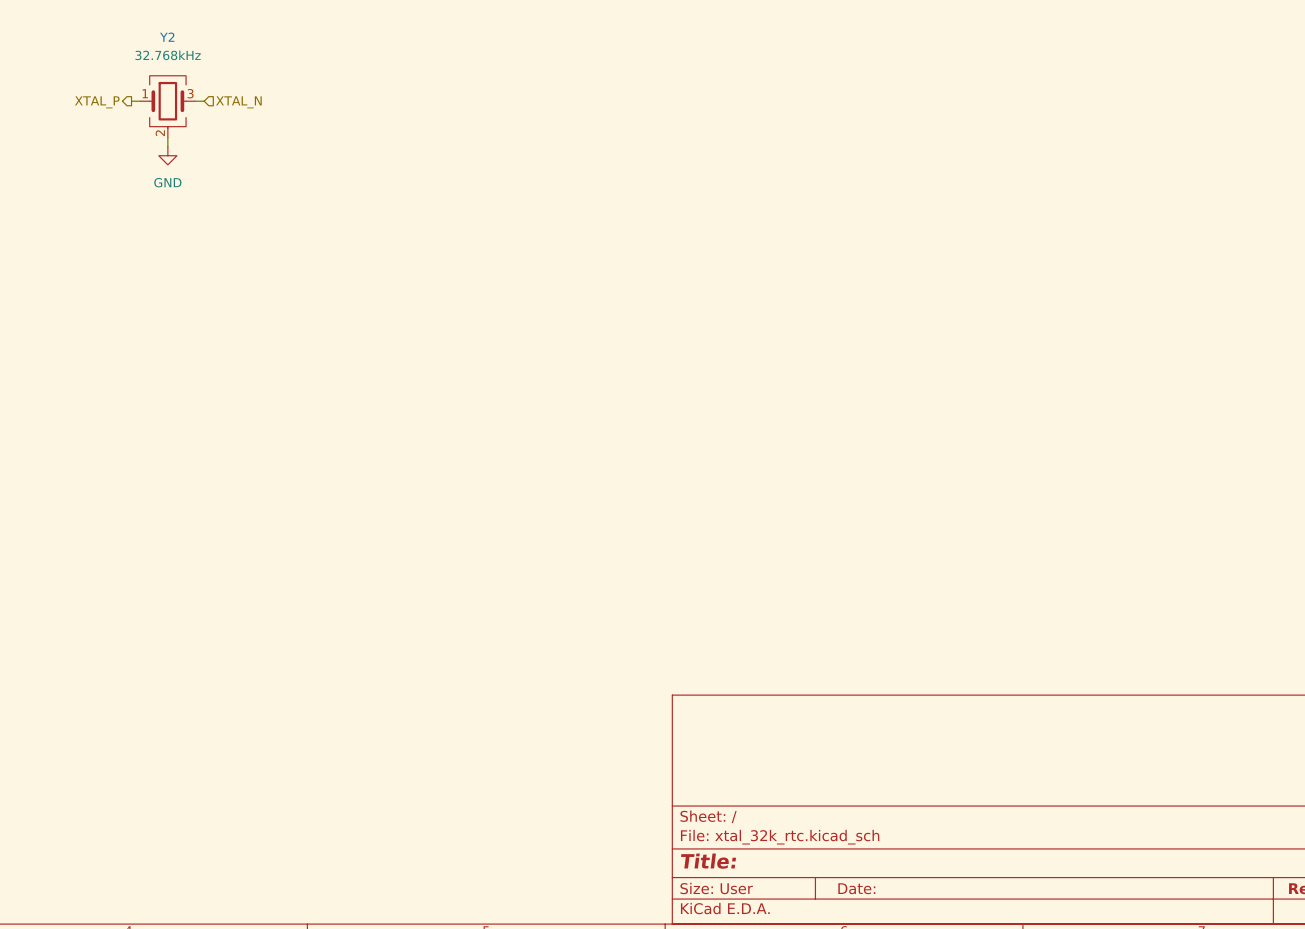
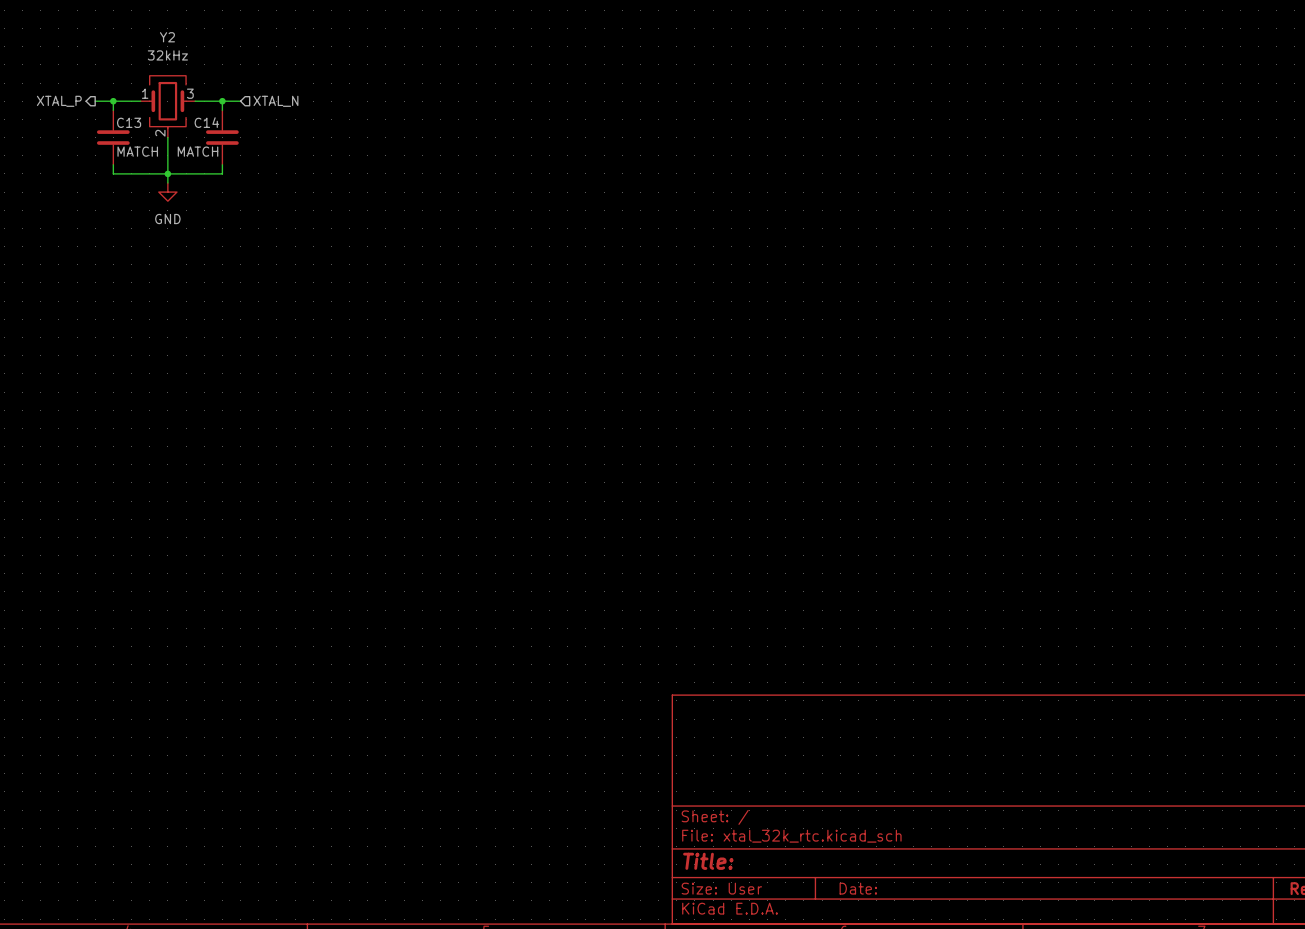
Y2 value: 32.768kHz (168, 55) -> 32kHz (167, 55)
wire: none -> (95, 101) (131, 101)
wire: none -> (113, 101) (113, 110)
junction: none -> (113, 101)
wire: none -> (204, 101) (240, 101)
wire: none -> (222, 101) (222, 110)
junction: none -> (222, 101)
hierarchical label position: XTAL_P (97, 102) -> XTAL_P (59, 101)
hierarchical label position: XTAL_N (238, 102) -> XTAL_N (275, 101)
C13: none -> MATCH (113, 137)
C14: none -> MATCH (222, 137)
wire: none -> (167, 146) (167, 183)
power symbol position: GND (167, 155) -> GND (167, 192)
wire: none -> (113, 164) (113, 173) (222, 173) (222, 164)
junction: none -> (167, 173)

